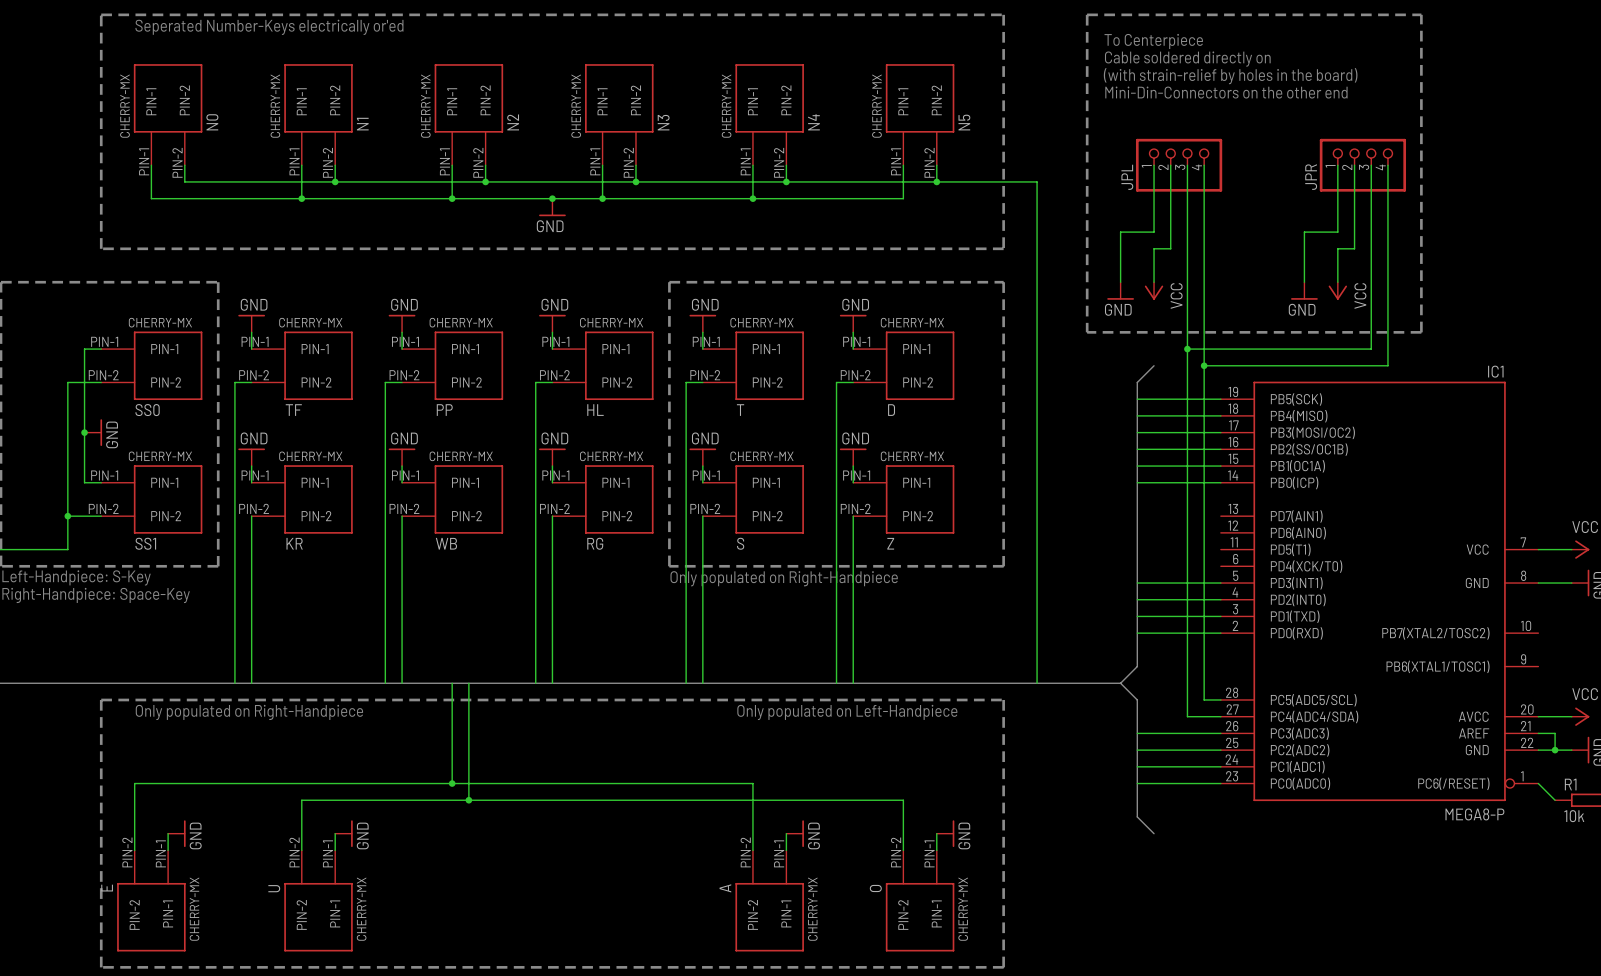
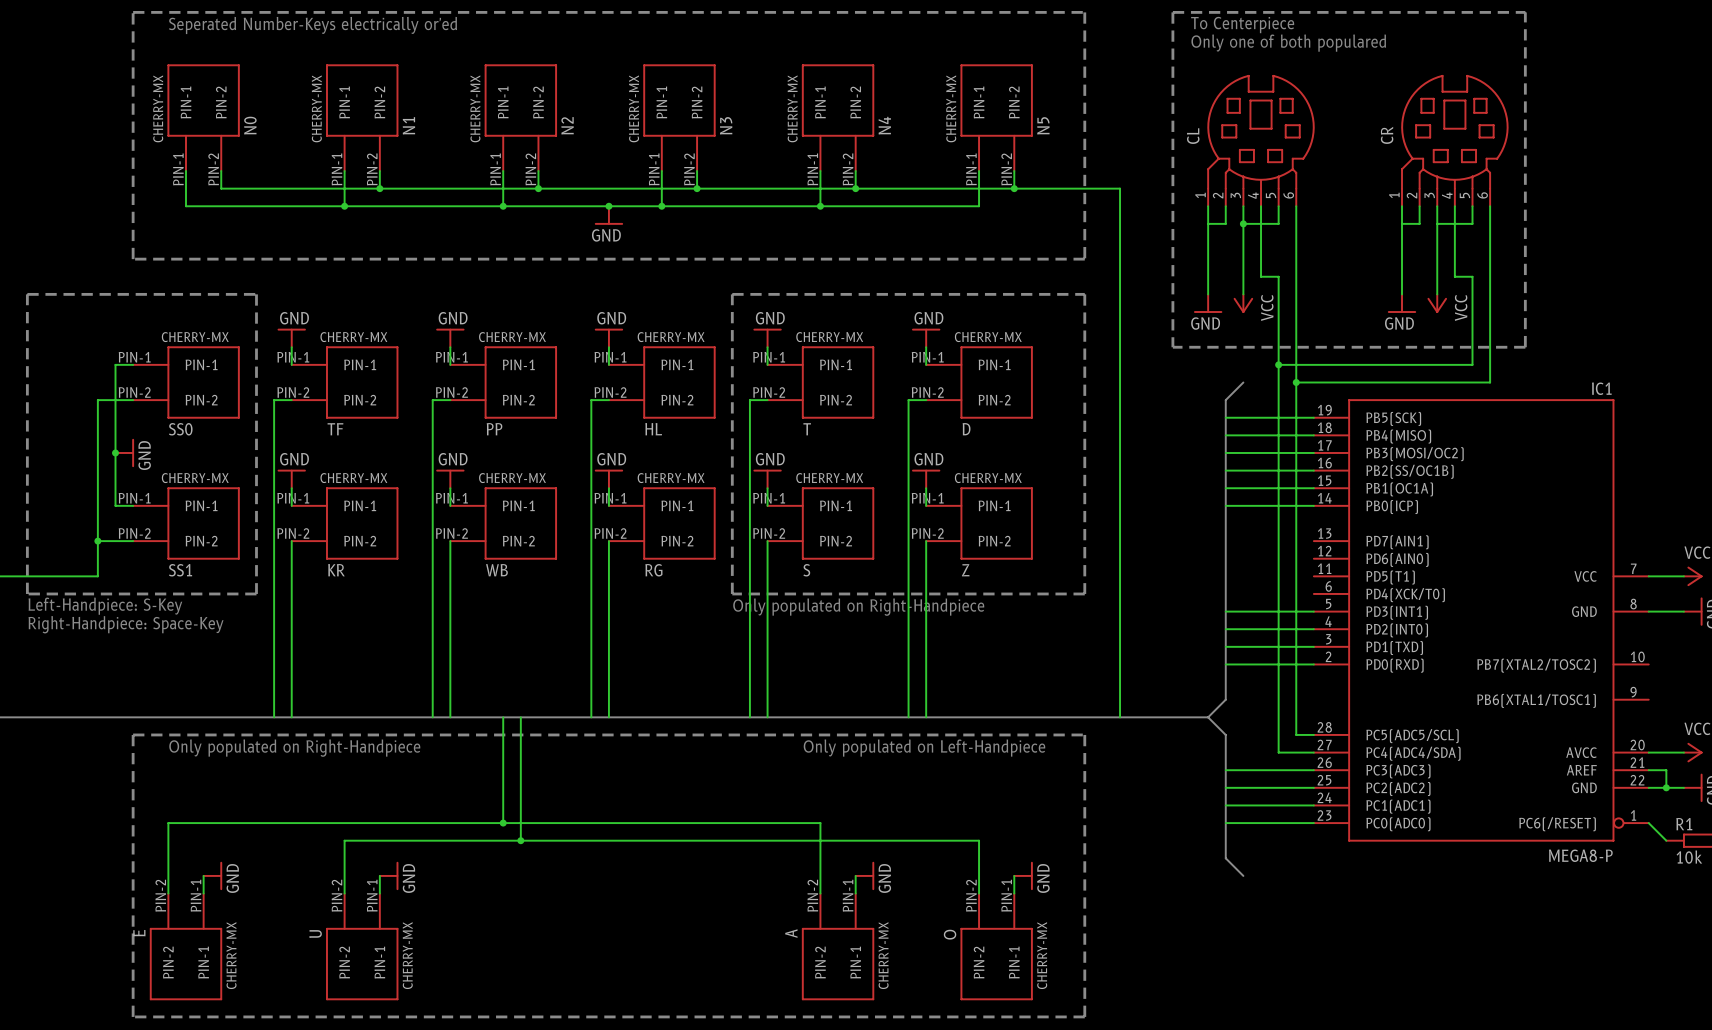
text position: To Centerpiece (1153, 41) -> To Centerpiece (1242, 25)
text: none -> Only one of both populared (1288, 43)
text: Cable soldered directly on (1187, 59) -> none
text: (with strain-relief by holes in the board) (1230, 76) -> none
text: Mini-Din-Connectors on the other end (1226, 92) -> none
CL: none -> (1260, 140)
CR: none -> (1454, 140)
JPL: (1179, 165) -> none
JPR: (1362, 165) -> none
wire: none -> (1225, 206) (1225, 223) (1208, 223)
wire: none -> (1419, 206) (1419, 223) (1402, 223)
wire: none -> (1243, 223) (1278, 223)
junction: none -> (1243, 223)
wire: (1187, 215) (1187, 265) -> (1261, 259) (1261, 276) (1278, 276)
wire: none -> (1437, 223) (1472, 223)
wire: (1371, 215) (1371, 265) -> (1454, 259) (1454, 276) (1472, 276)
wire: (1120, 232) (1154, 232) -> (1208, 241) (1208, 206)
wire: (1304, 232) (1337, 232) -> (1402, 241) (1402, 206)
wire: (1154, 248) (1170, 248) -> (1243, 259) (1243, 241)
wire: (1337, 248) (1354, 248) -> (1437, 259) (1437, 241)

